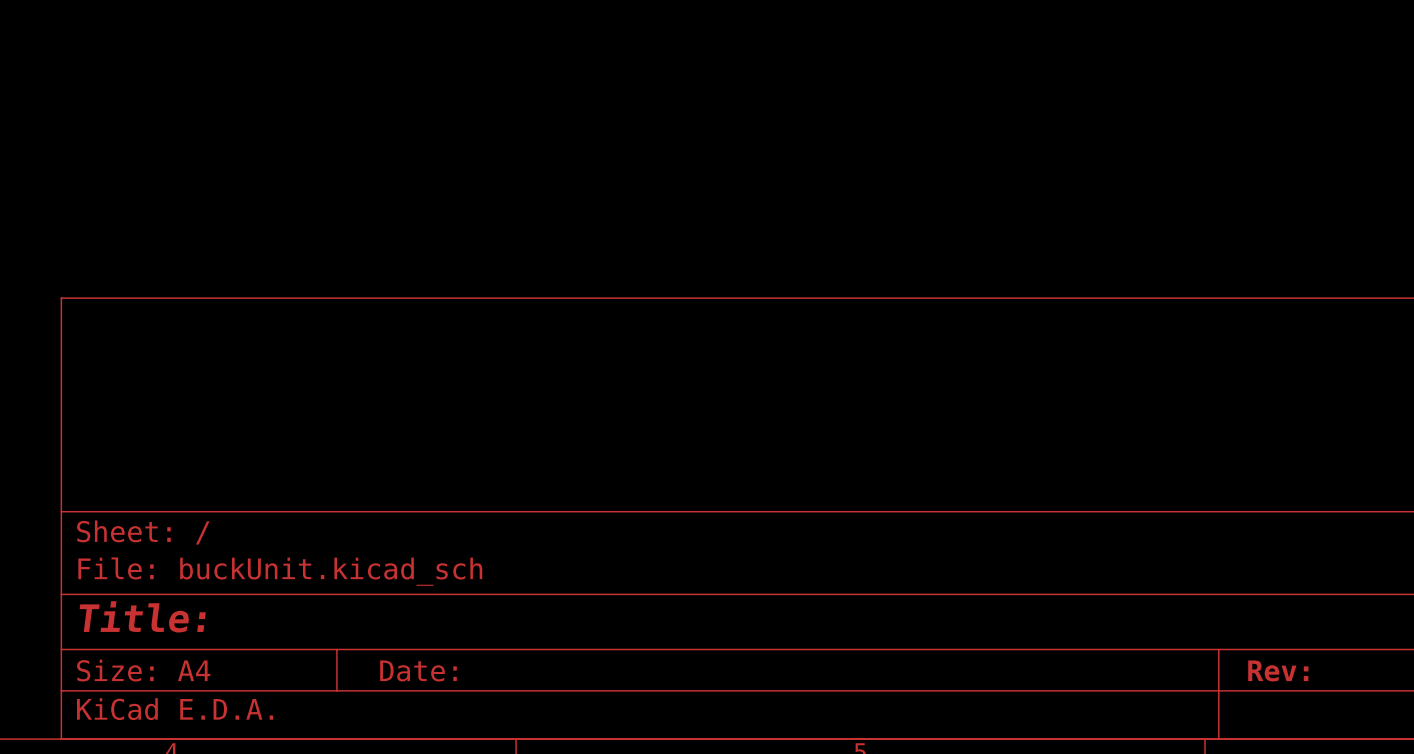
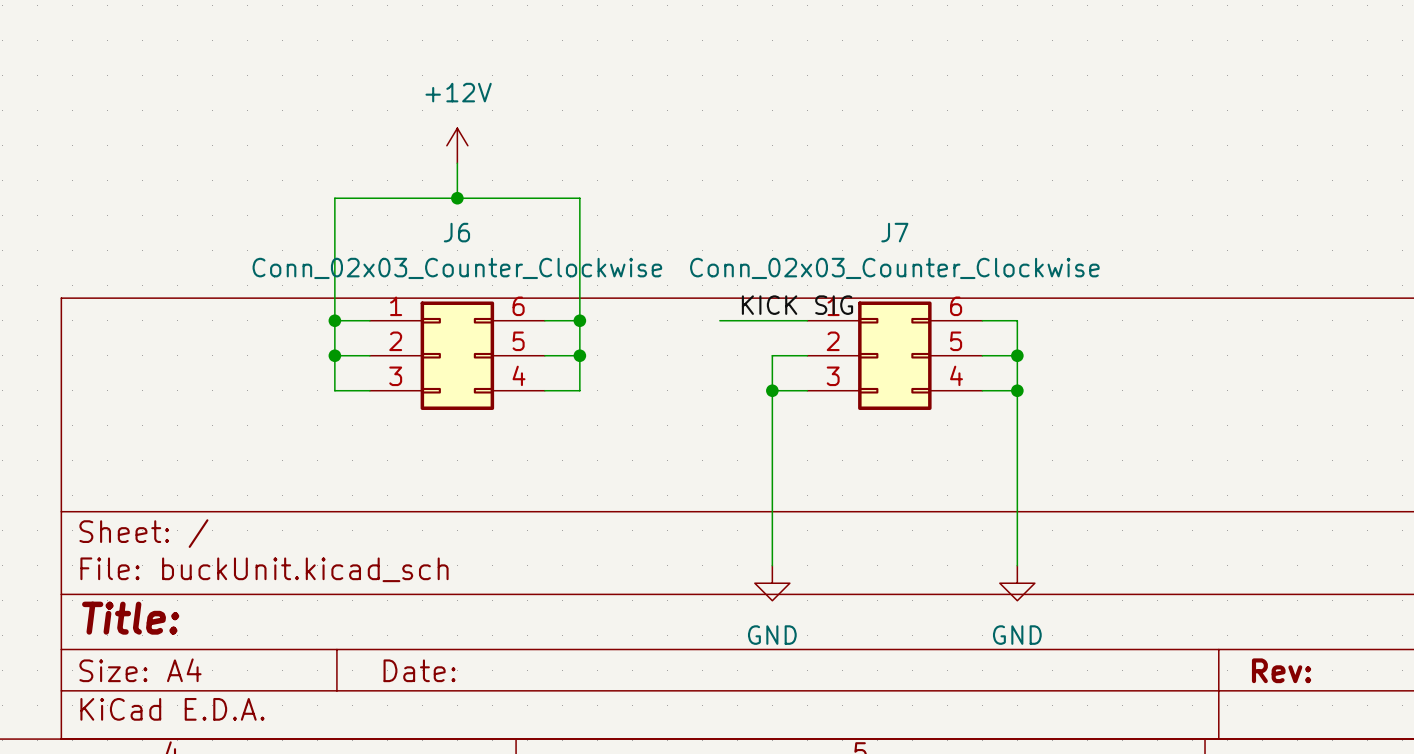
power symbol: none -> +12V (457, 145)
wire: none -> (457, 163) (457, 198)
junction: none -> (457, 198)
label: none -> KICK SIG (797, 305)
wire: none -> (334, 320) (369, 320)
junction: none -> (334, 320)
wire: none -> (544, 320) (579, 320)
junction: none -> (579, 320)
wire: none -> (719, 320) (807, 320)
wire: none -> (982, 320) (1017, 320) (1017, 565)
wire: none -> (334, 355) (369, 355)
junction: none -> (334, 355)
J6: none -> Conn_02x03_Counter_Clockwise (457, 355)
wire: none -> (544, 355) (579, 355)
junction: none -> (579, 355)
wire: none -> (807, 355) (772, 355) (772, 565)
J7: none -> Conn_02x03_Counter_Clockwise (894, 355)
wire: none -> (982, 355) (1017, 355)
junction: none -> (1017, 355)
wire: none -> (369, 390) (334, 390) (334, 198) (579, 198) (579, 390) (544, 390)
wire: none -> (772, 390) (807, 390)
junction: none -> (772, 390)
wire: none -> (982, 390) (1017, 390)
junction: none -> (1017, 390)
power symbol: none -> GND (772, 583)
power symbol: none -> GND (1017, 583)

